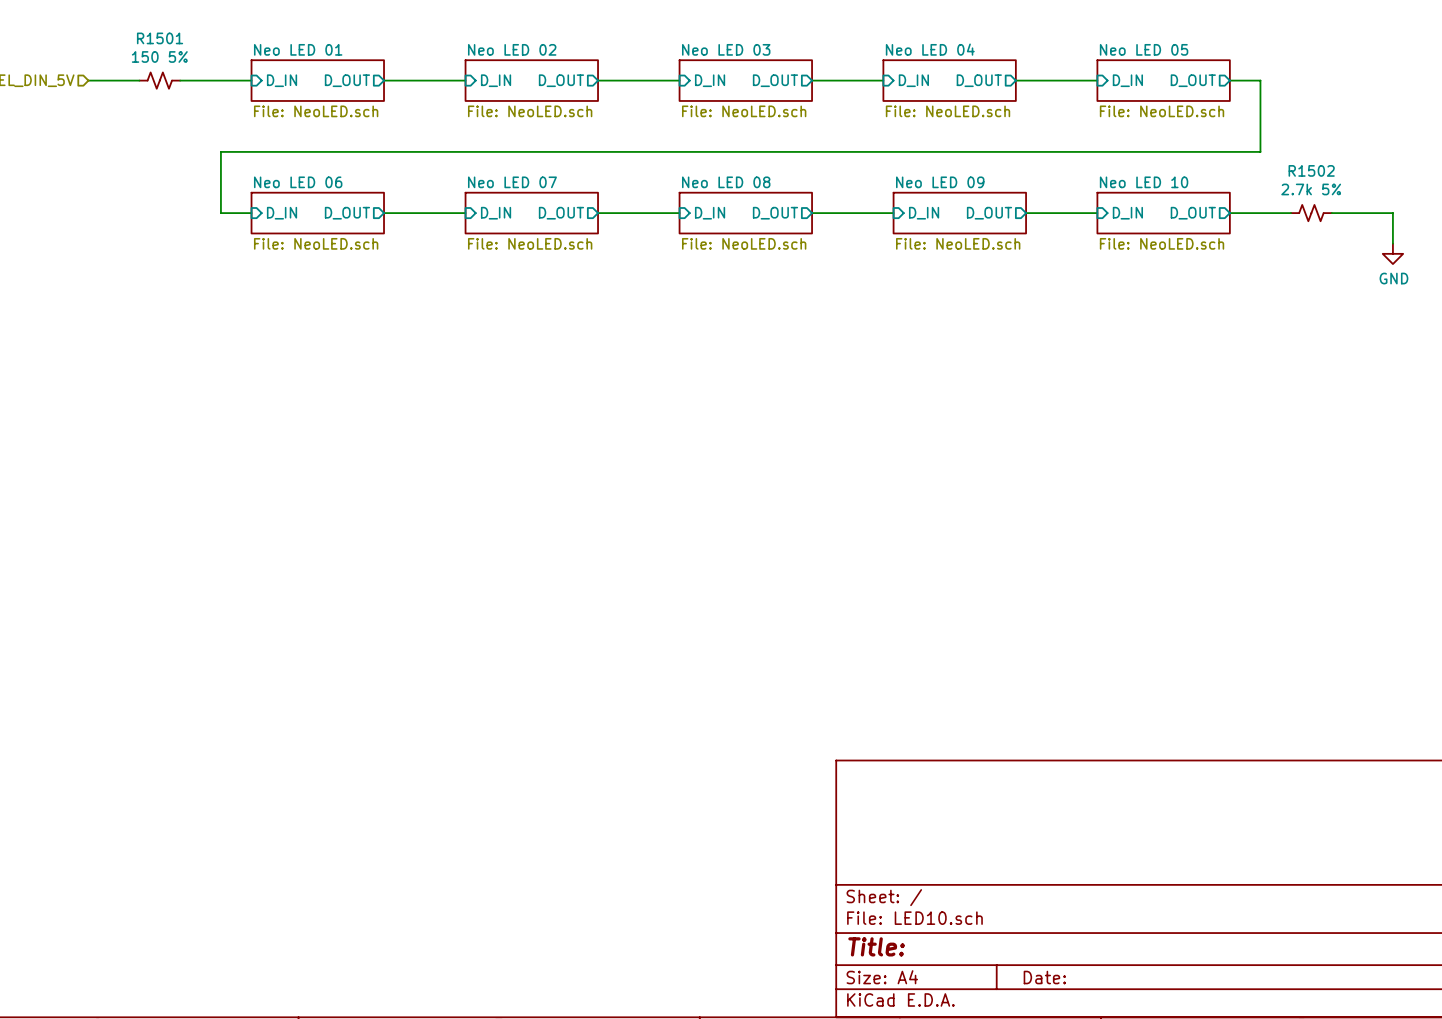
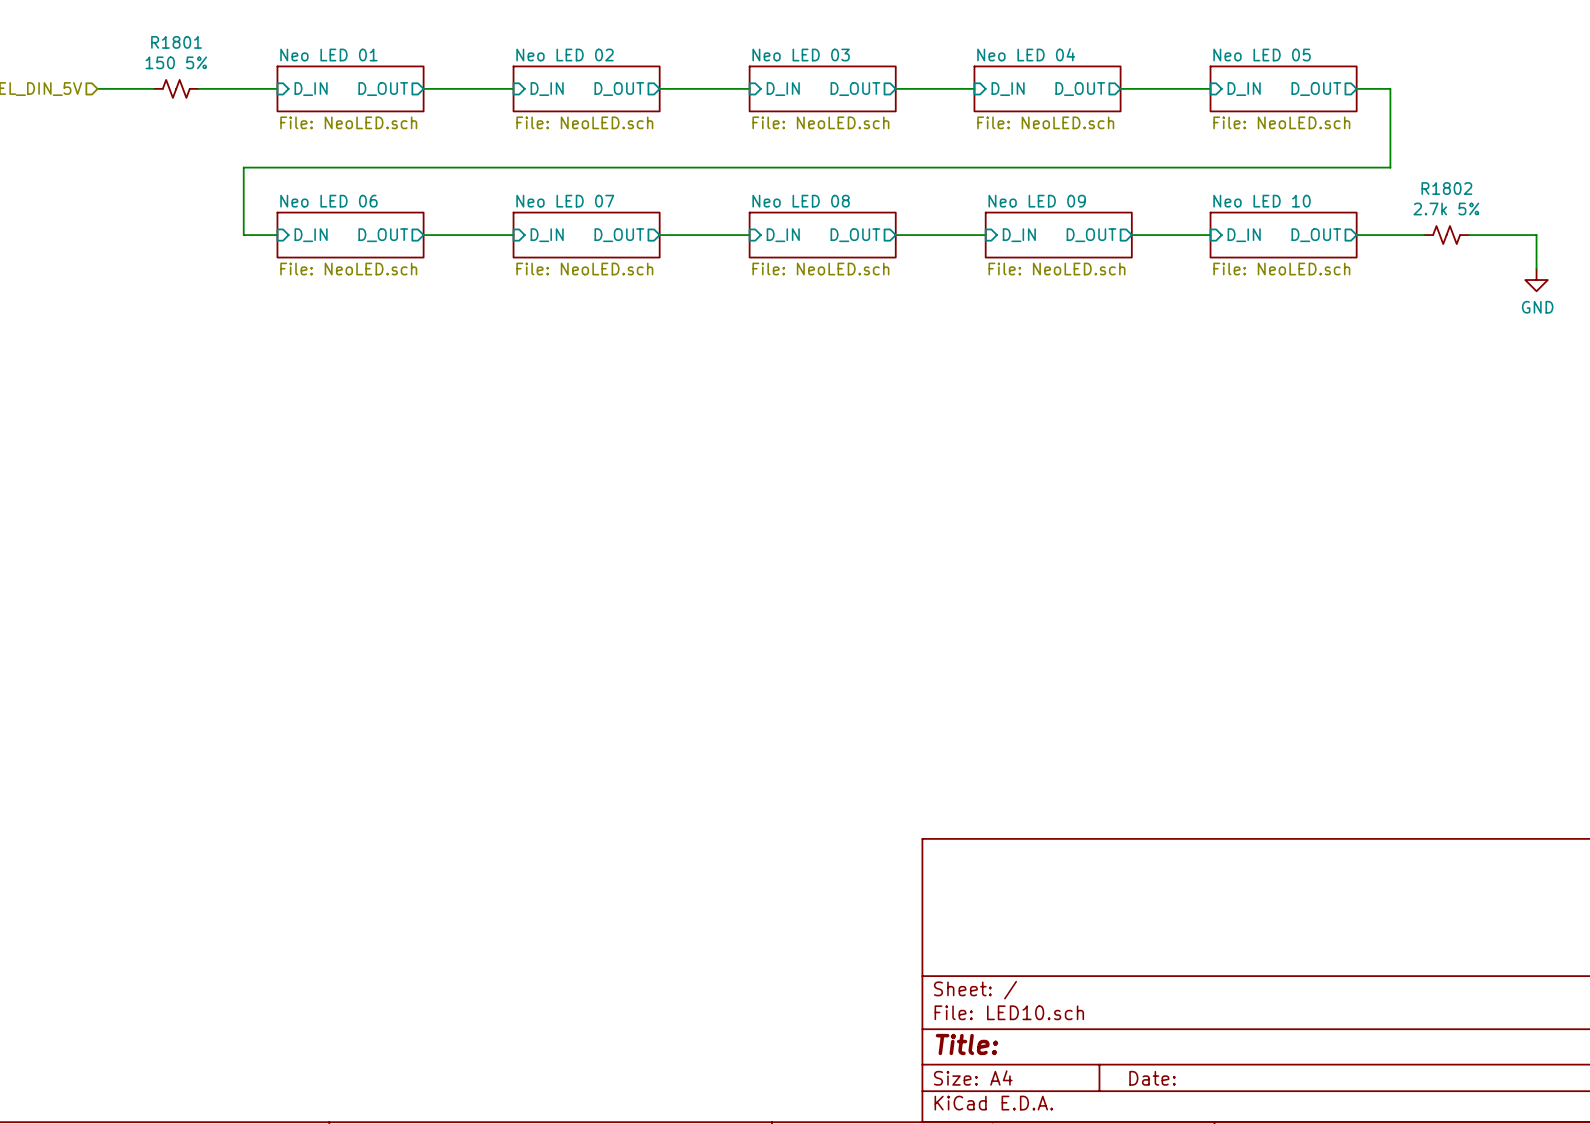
R1501 name: R1501 (160, 38) -> R1801 (176, 42)
R1502 name: R1502 (1311, 170) -> R1802 (1446, 188)

